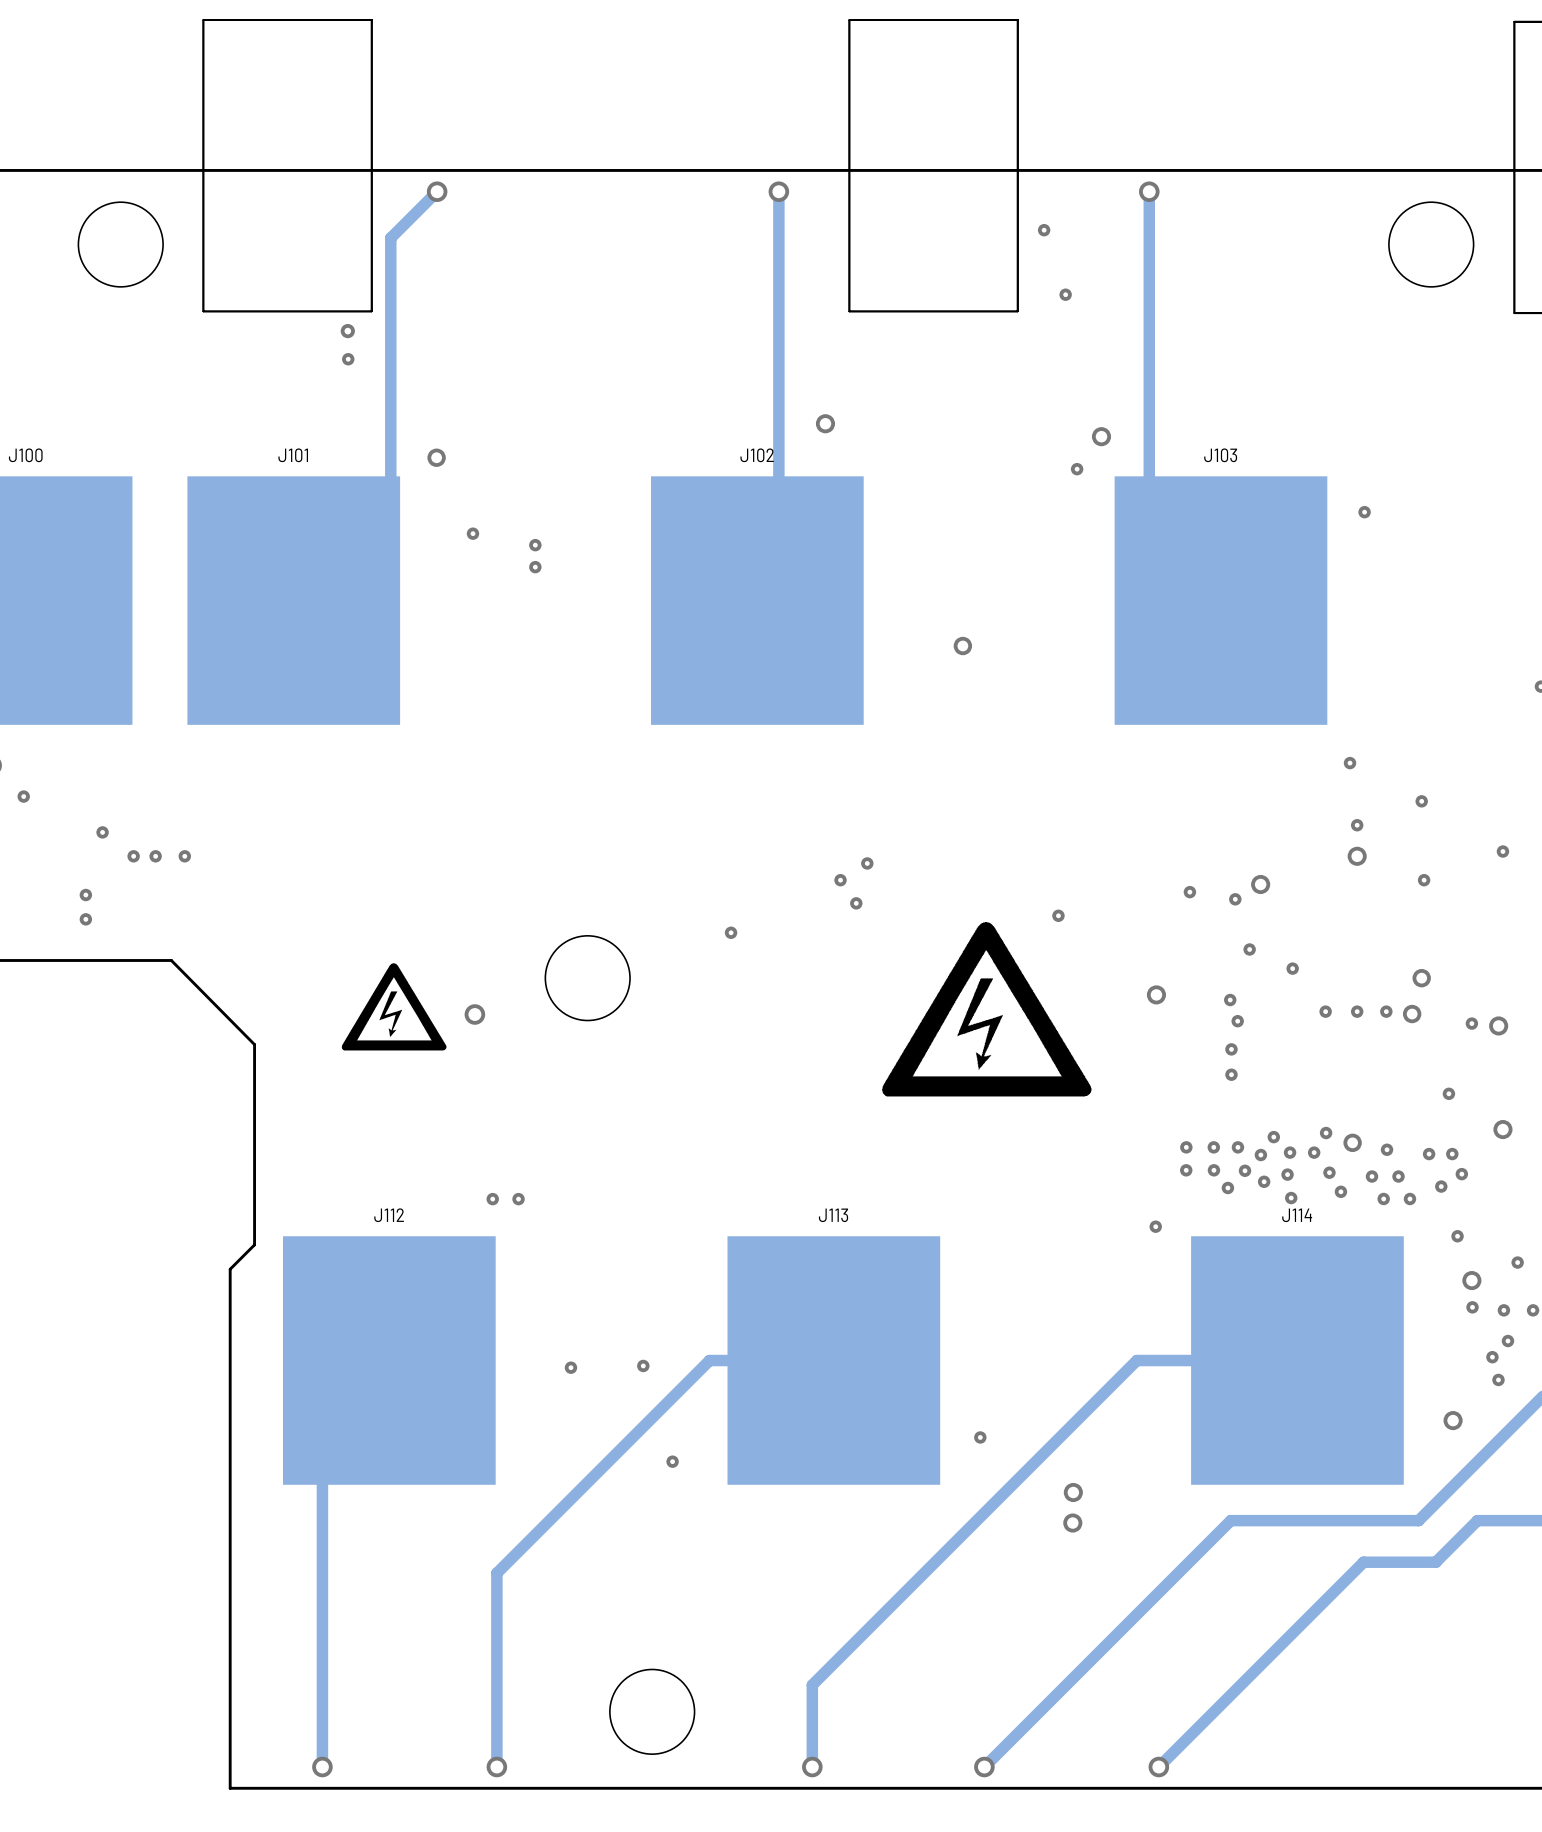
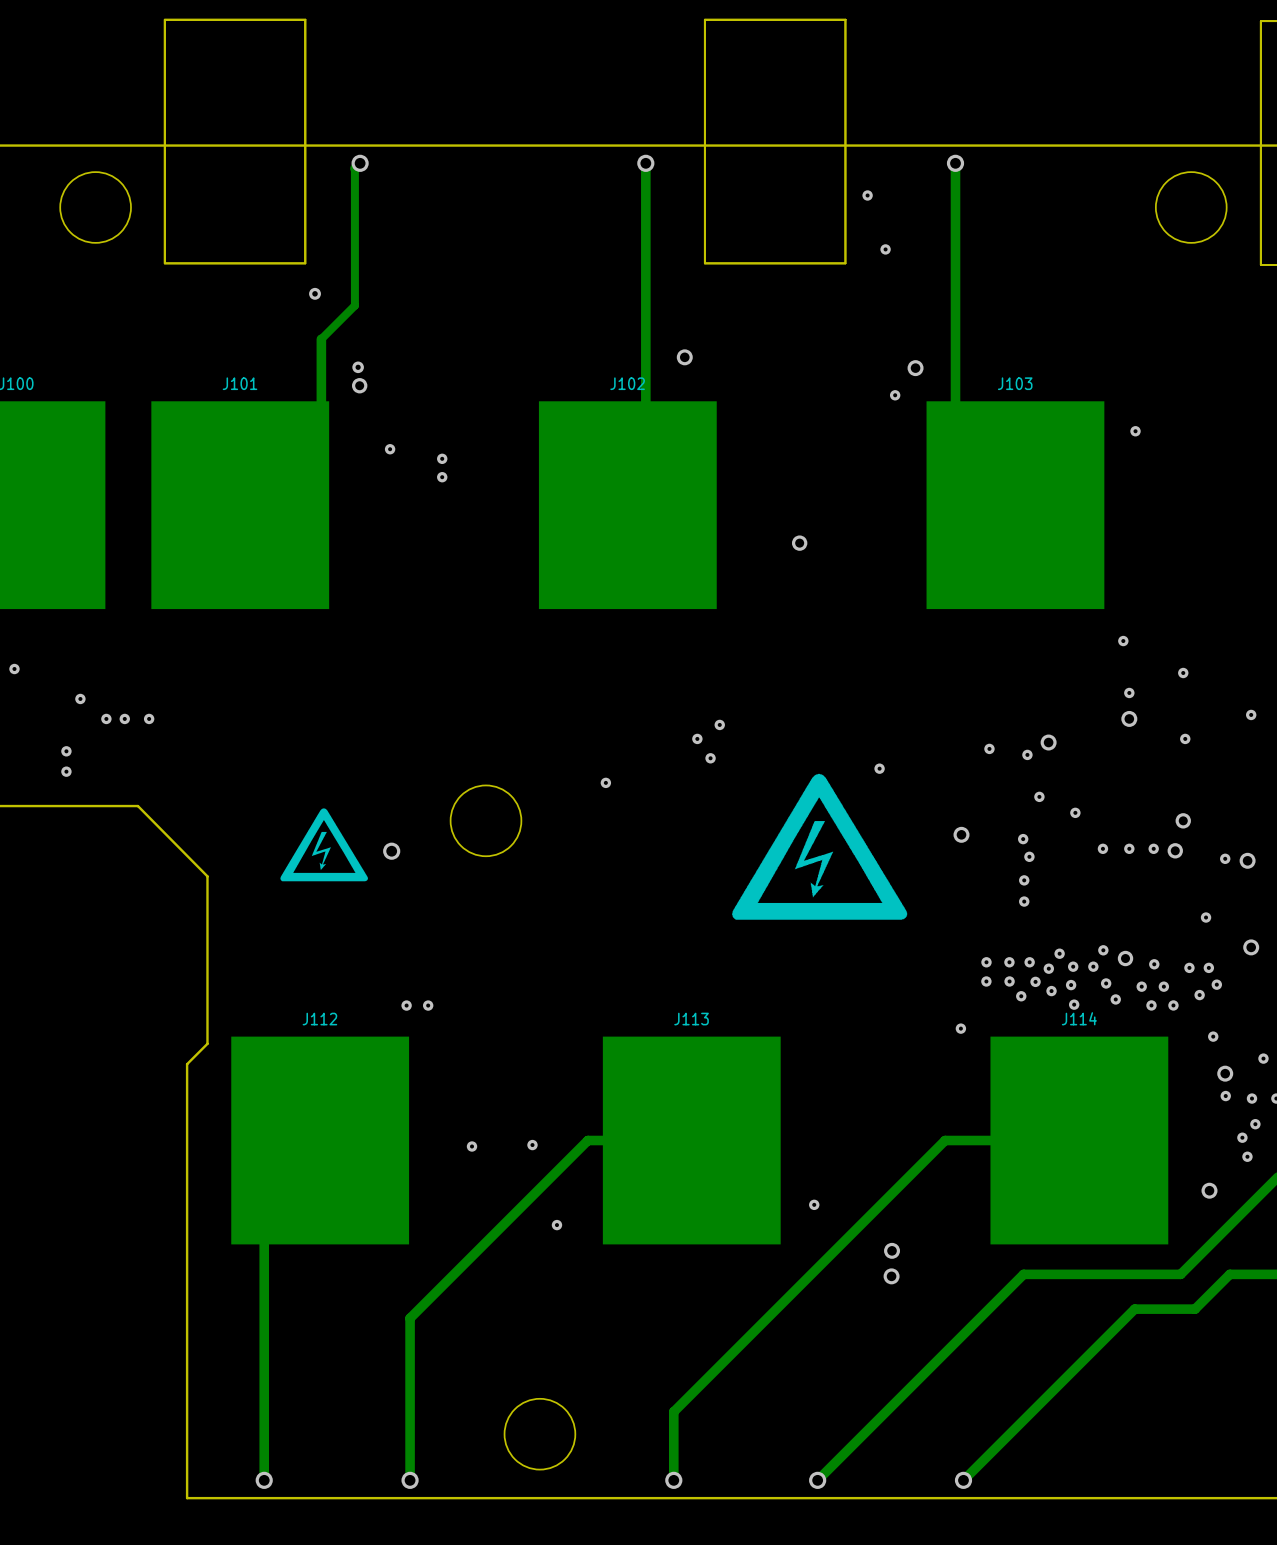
track: (430, 197) (390, 238) (390, 402) -> (354, 168) (354, 305) (321, 339)
via position: (347, 331) -> (315, 293)
via: (348, 359) -> none
via: none -> (358, 367)

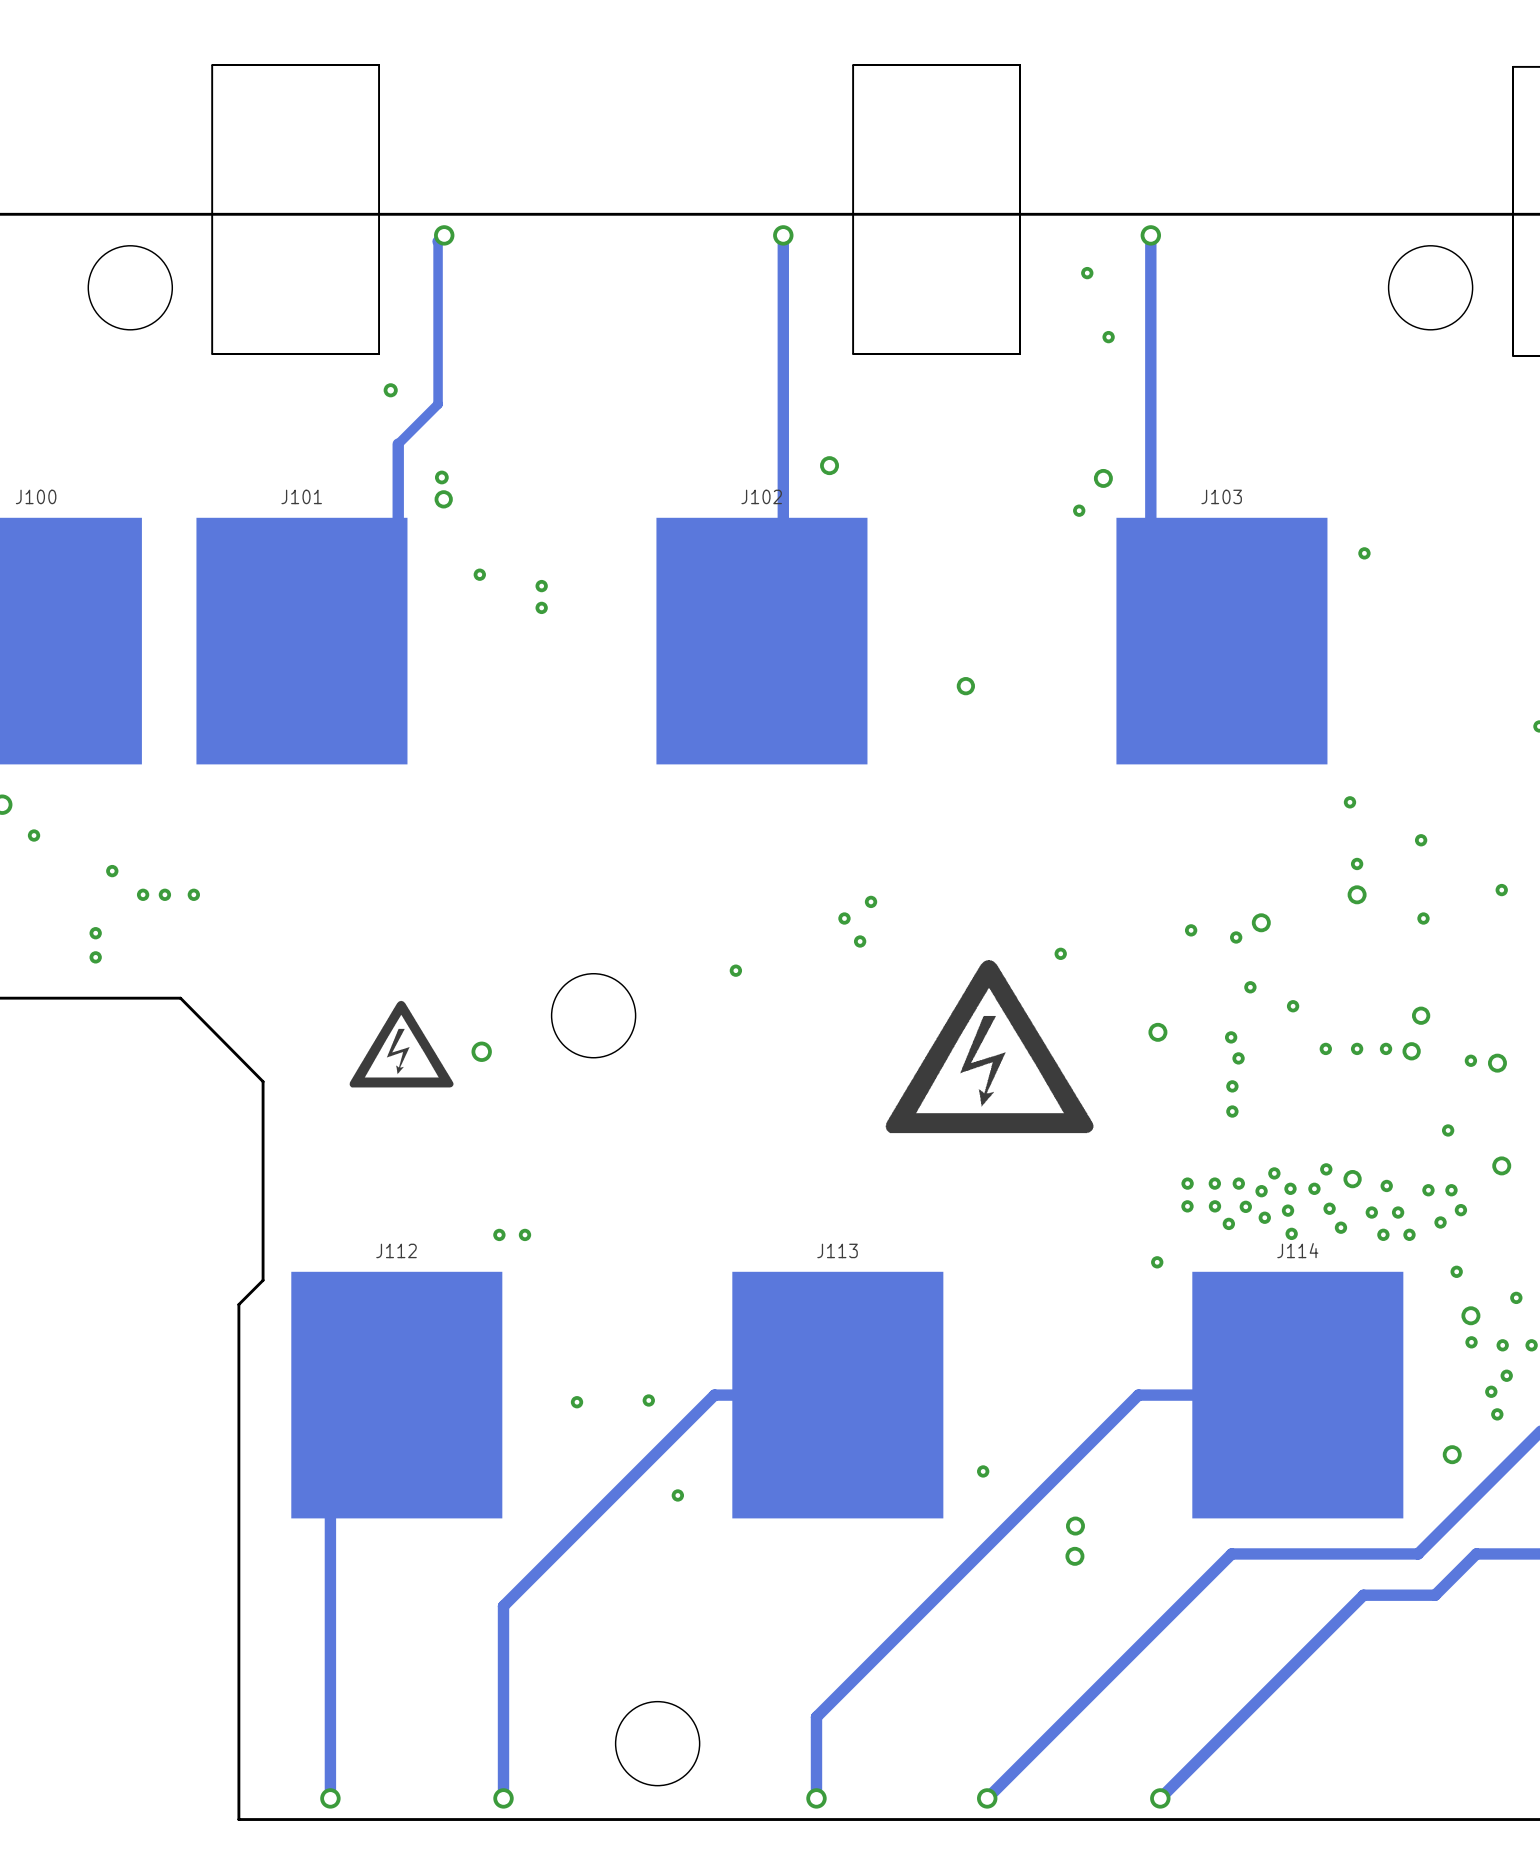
via: (867, 195) -> none
via: none -> (1087, 273)
via: (885, 249) -> none
via: none -> (1108, 337)

